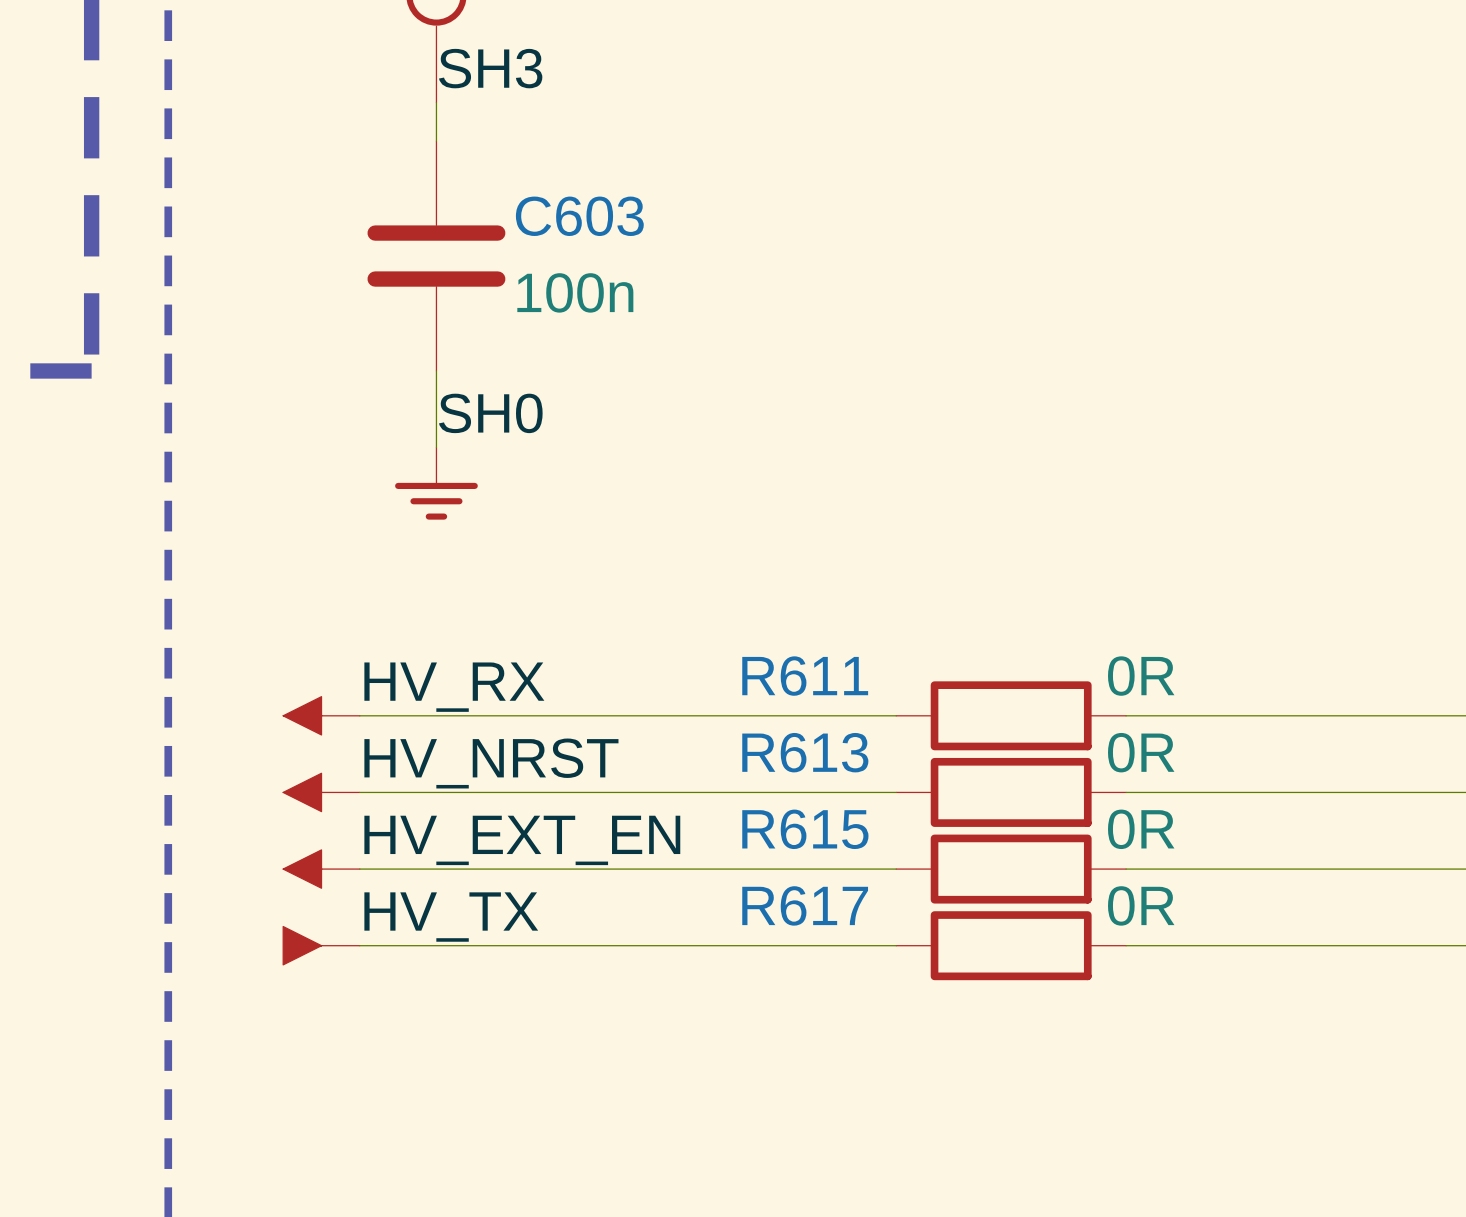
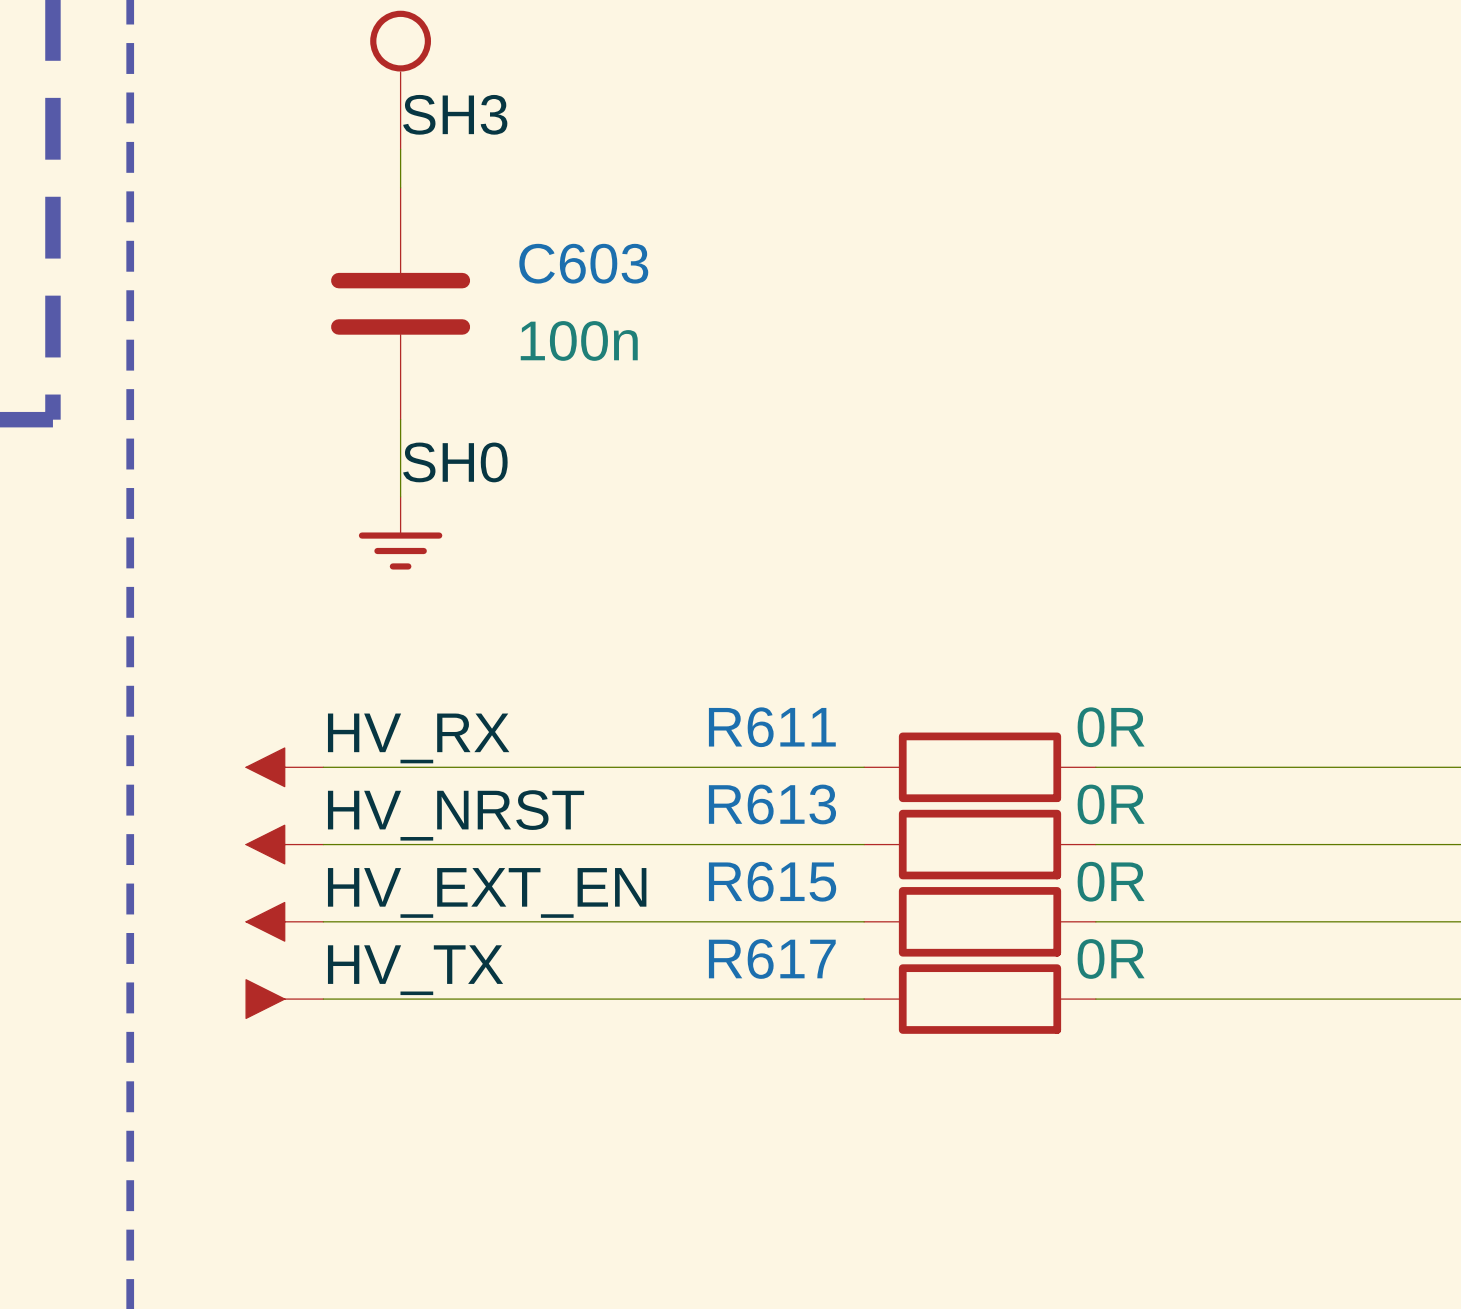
C603 name position: C603 (579, 216) -> C603 (583, 263)
C603 value position: 100n (575, 292) -> 100n (579, 340)

